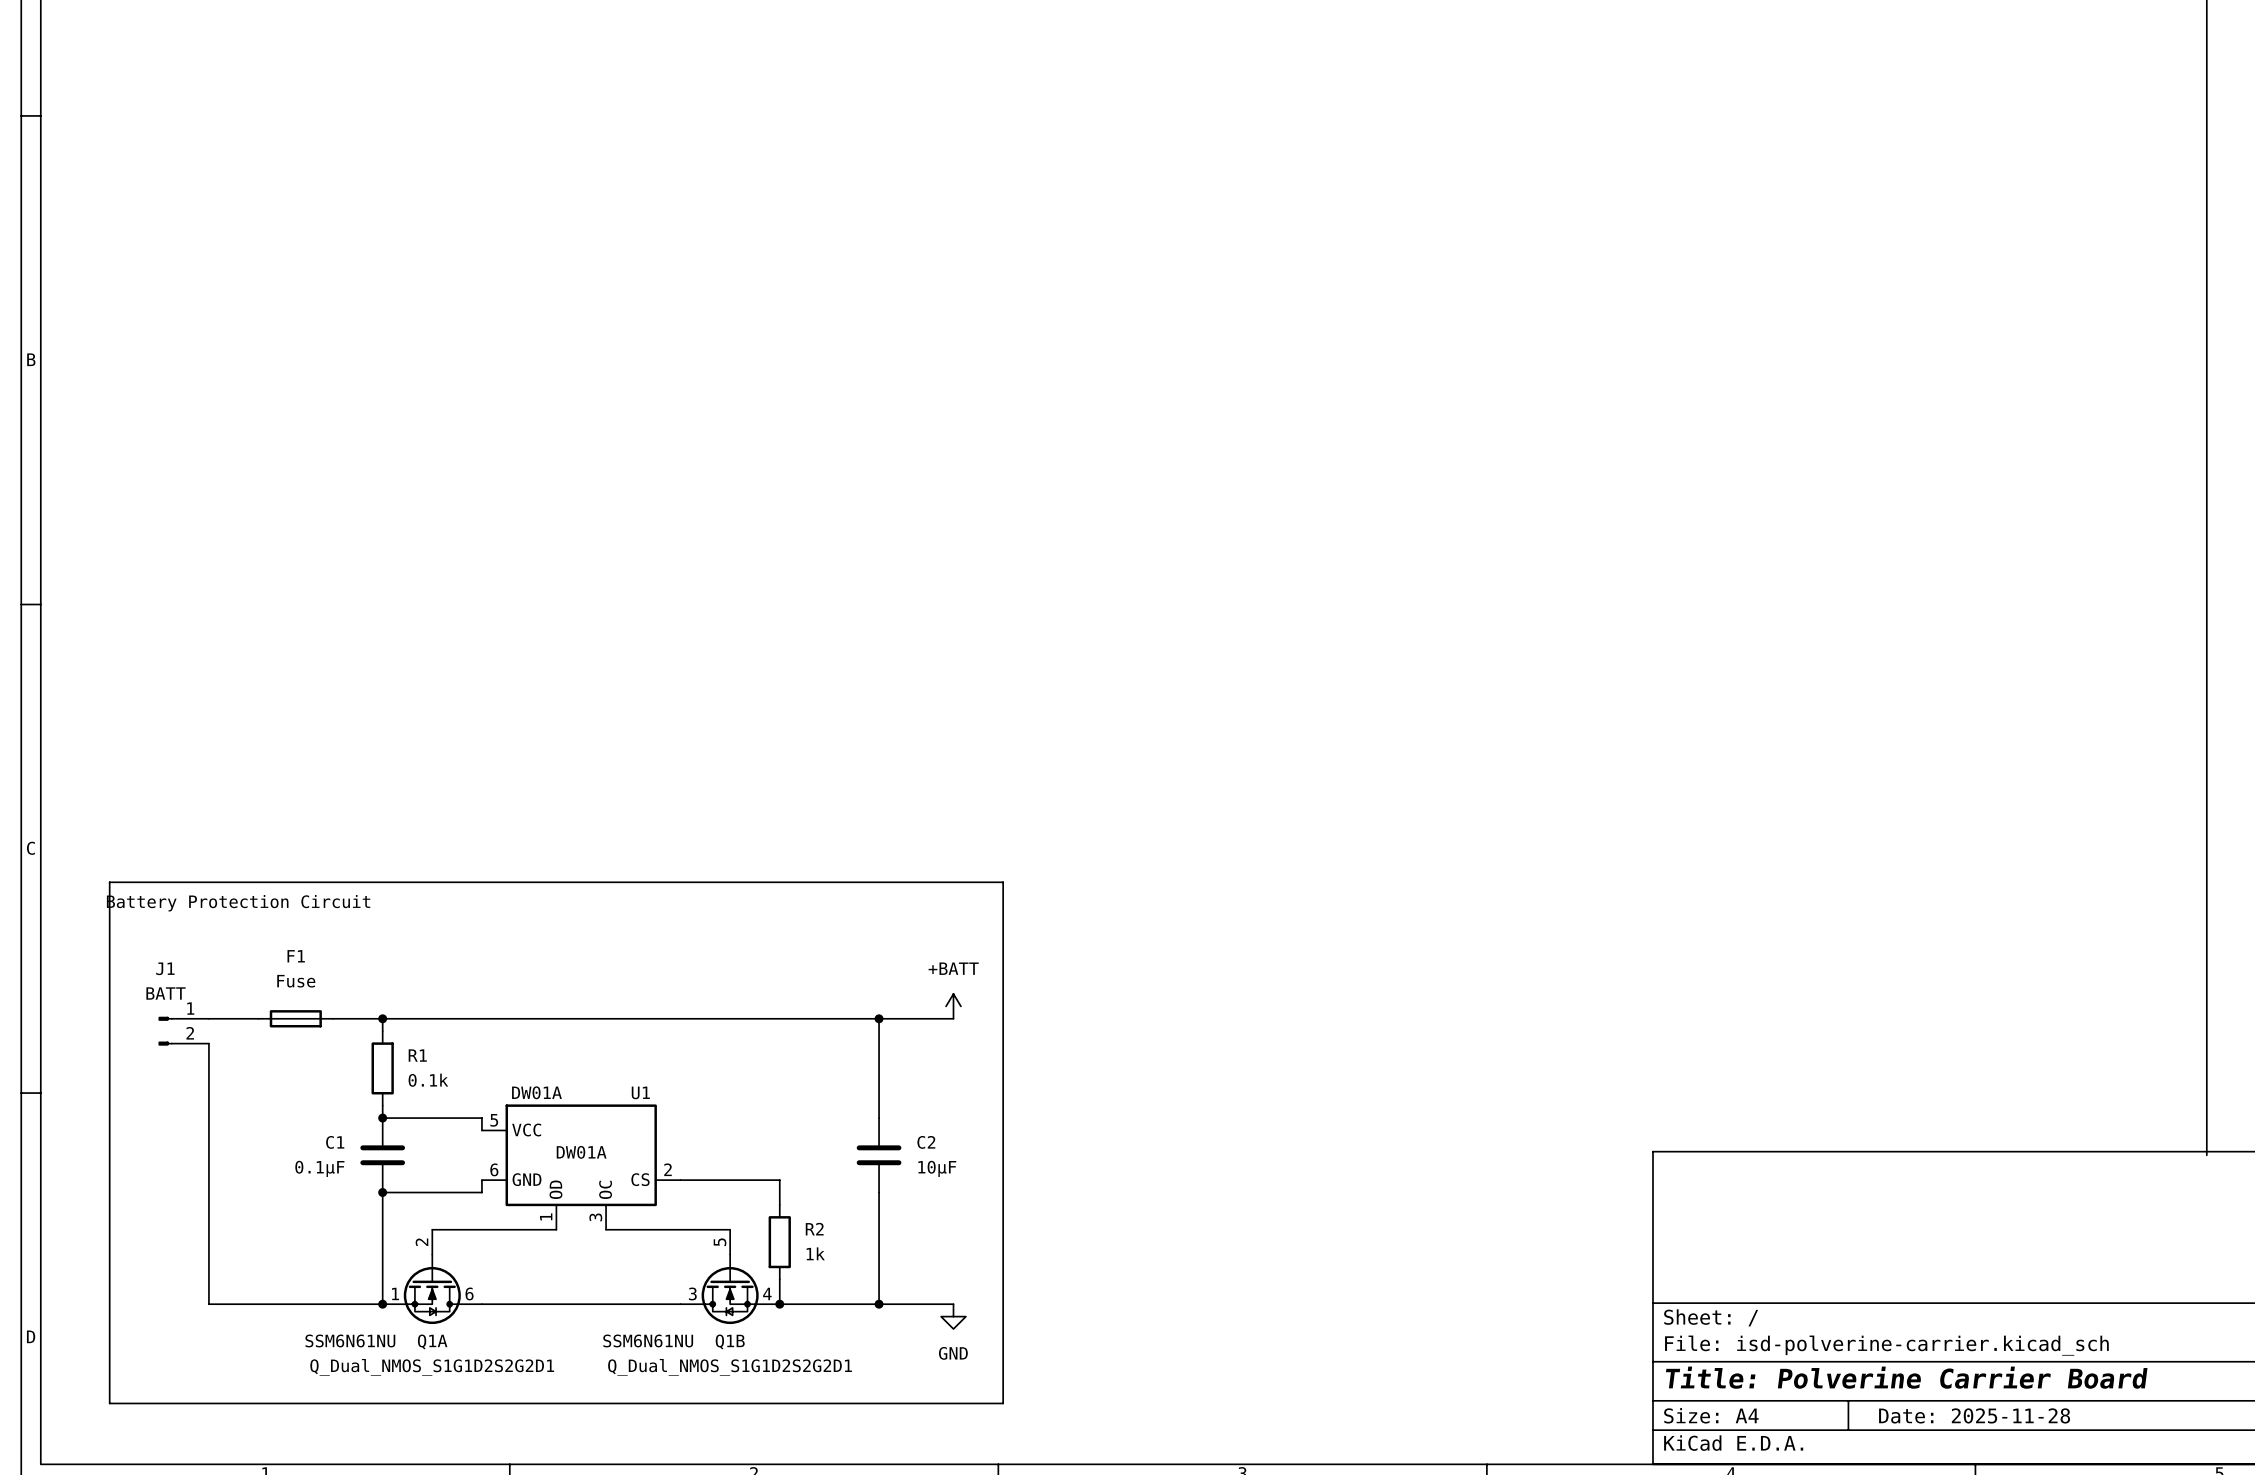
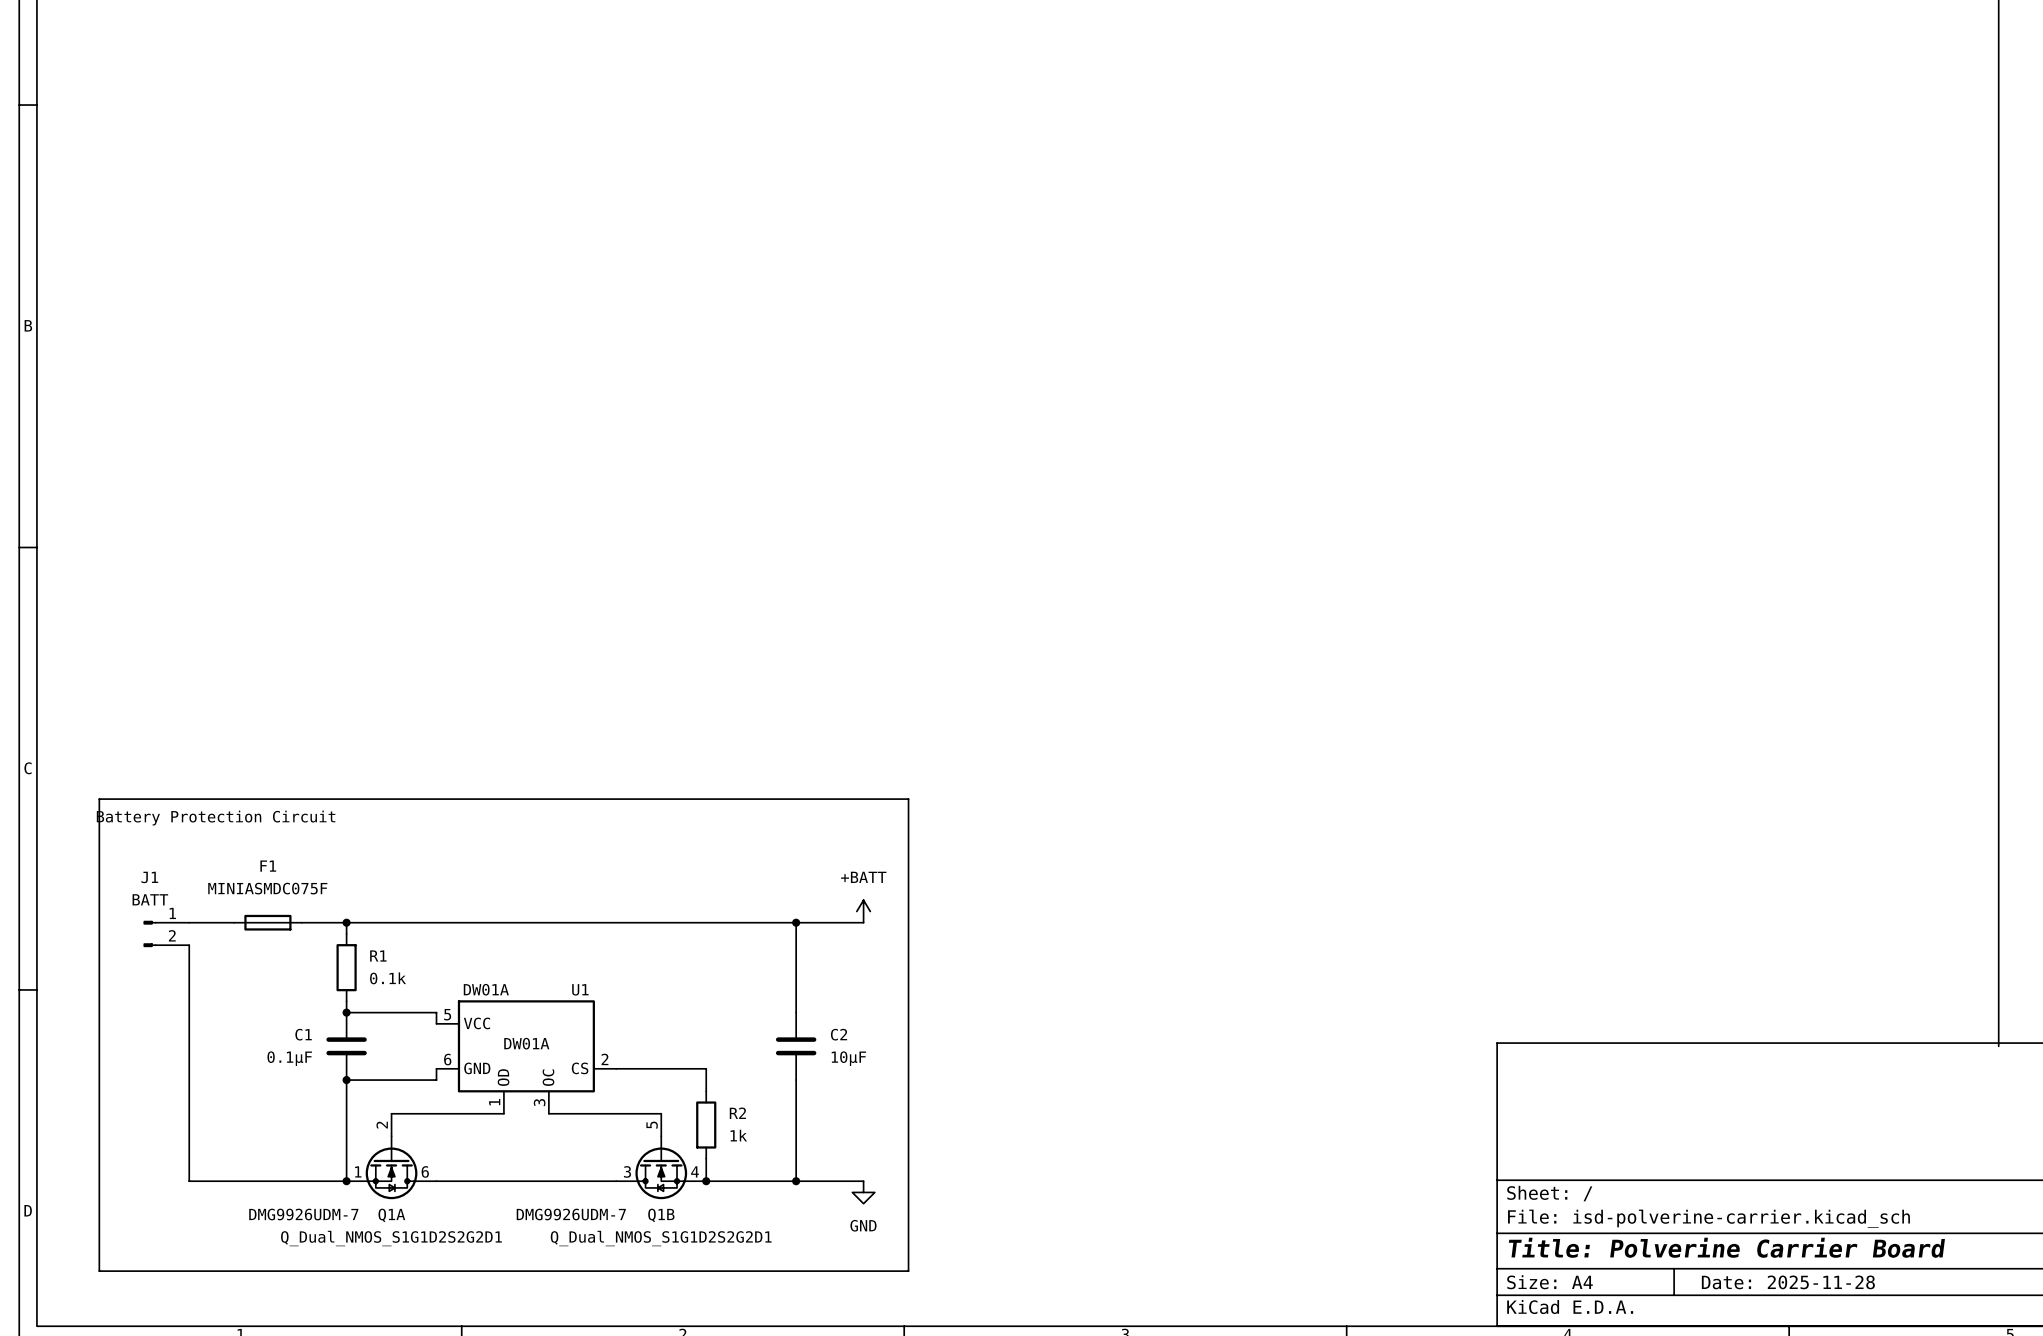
F1 value: Fuse (296, 981) -> MINIASMDC075F (267, 888)
Q1A text: SSM6N61NU (350, 1340) -> DMG9926UDM-7 (303, 1214)
Q1B text: SSM6N61NU (648, 1340) -> DMG9926UDM-7 (571, 1214)

